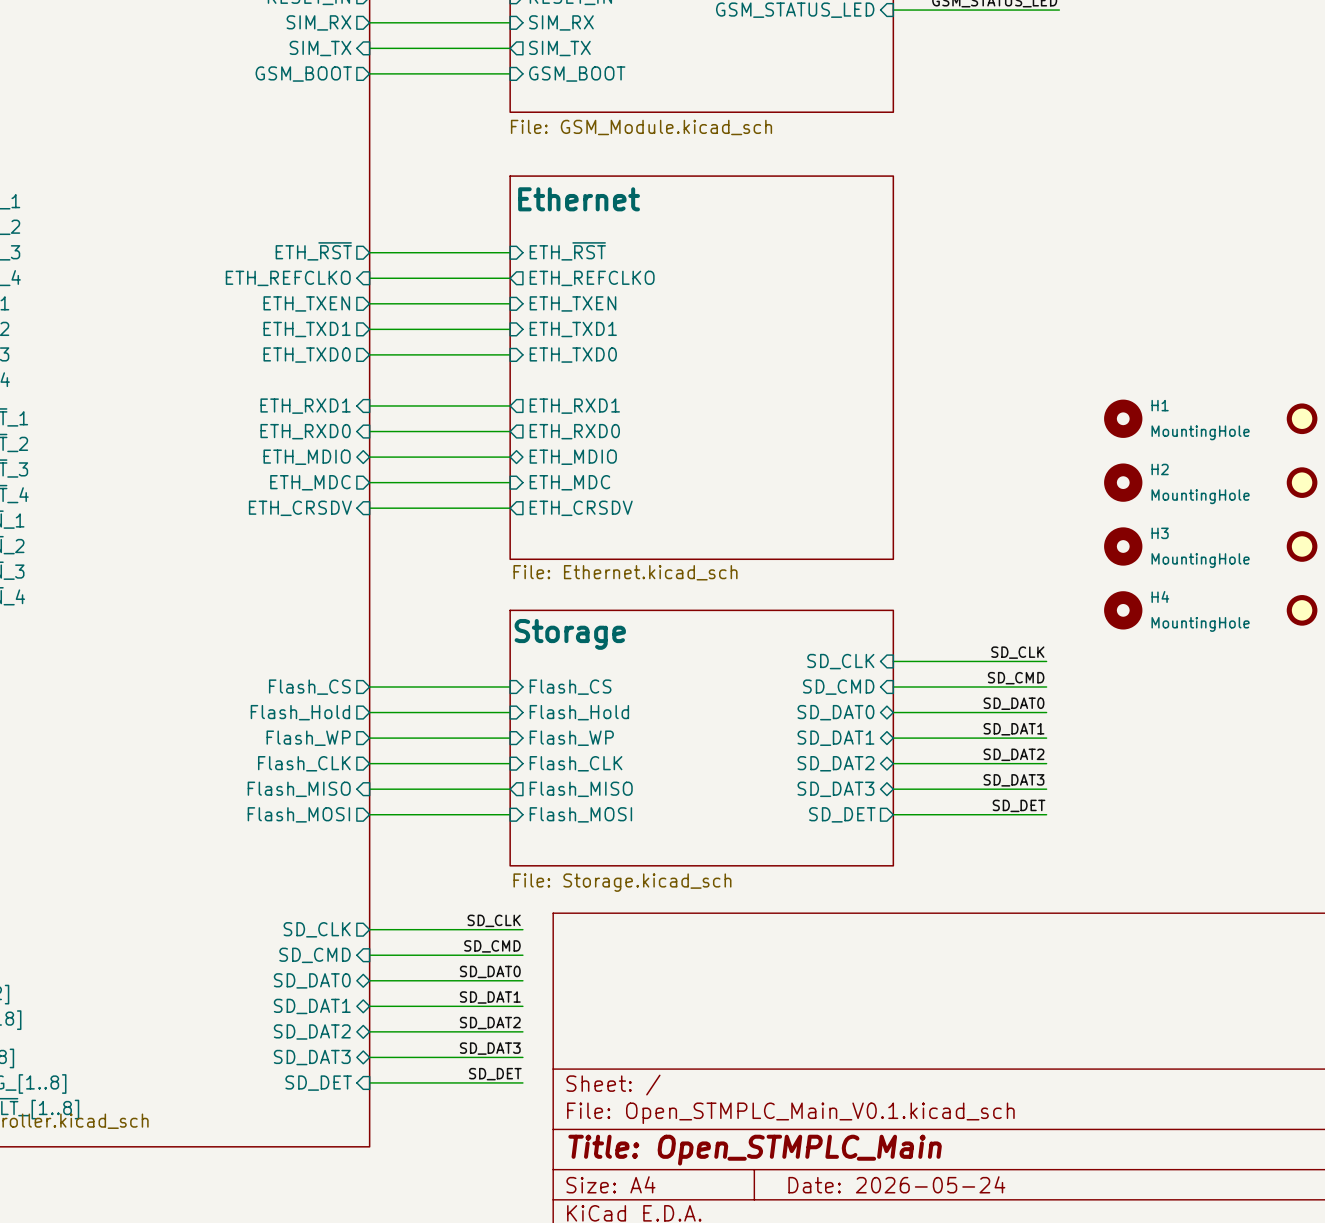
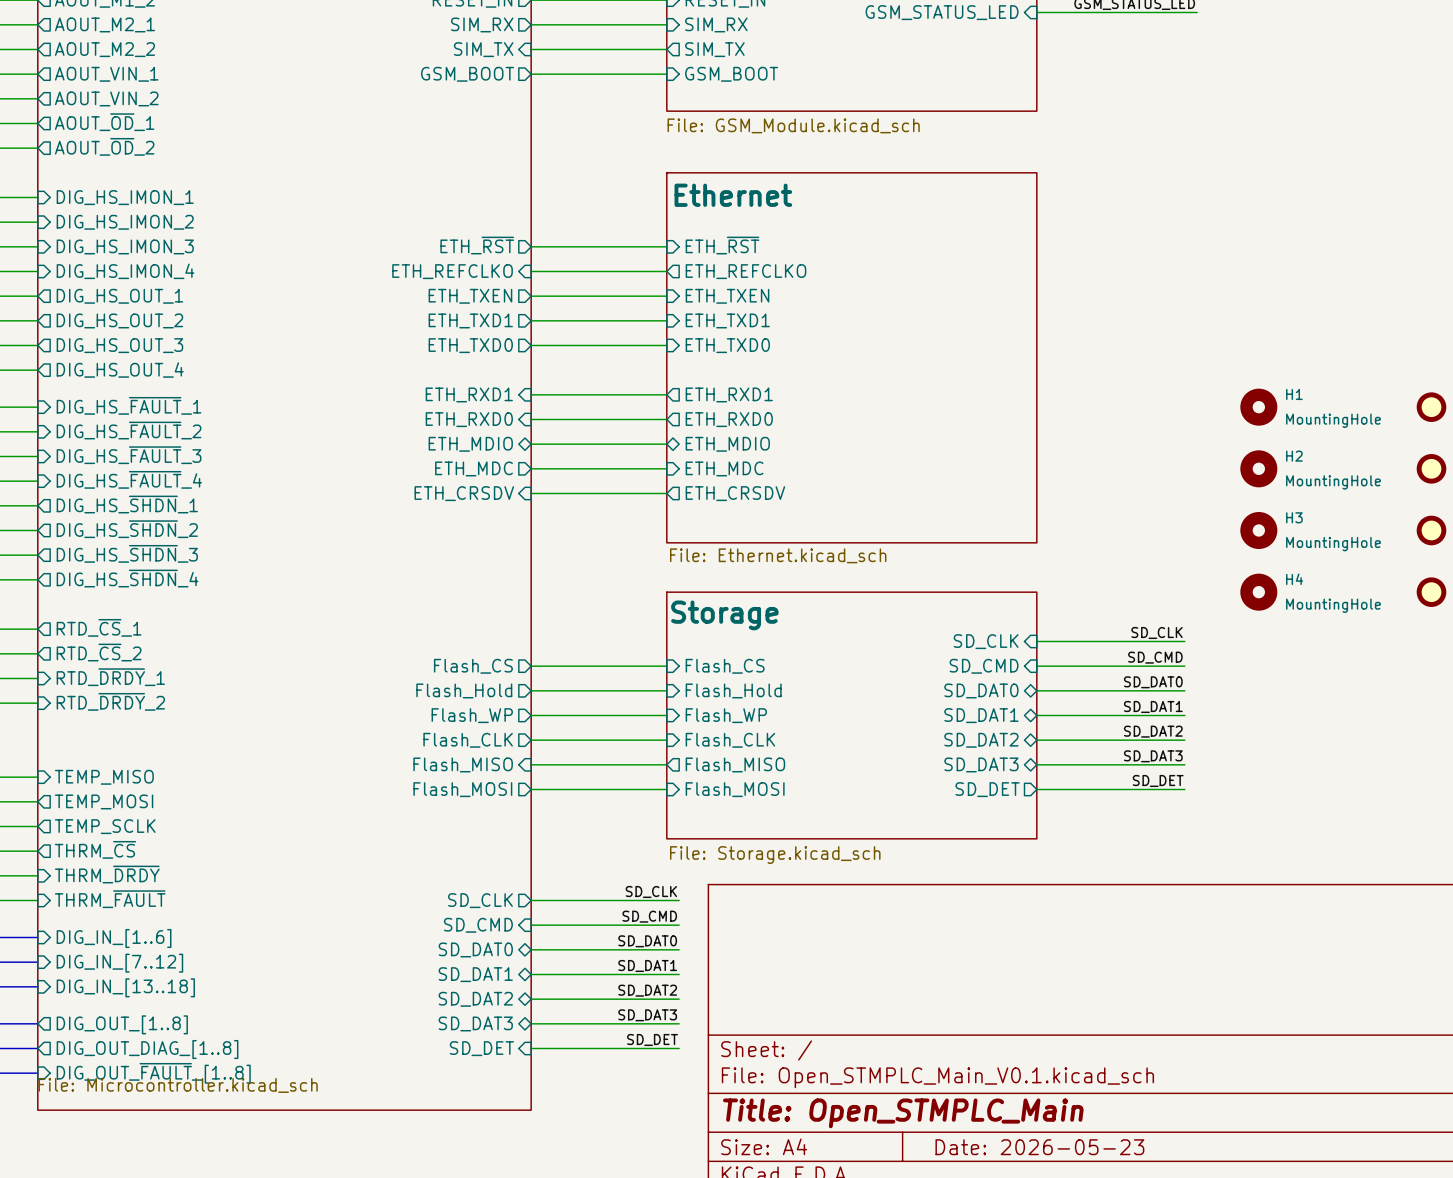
title block: Date: 2026-05-24 (896, 1184) -> Date: 2026-05-23 (1039, 1147)

